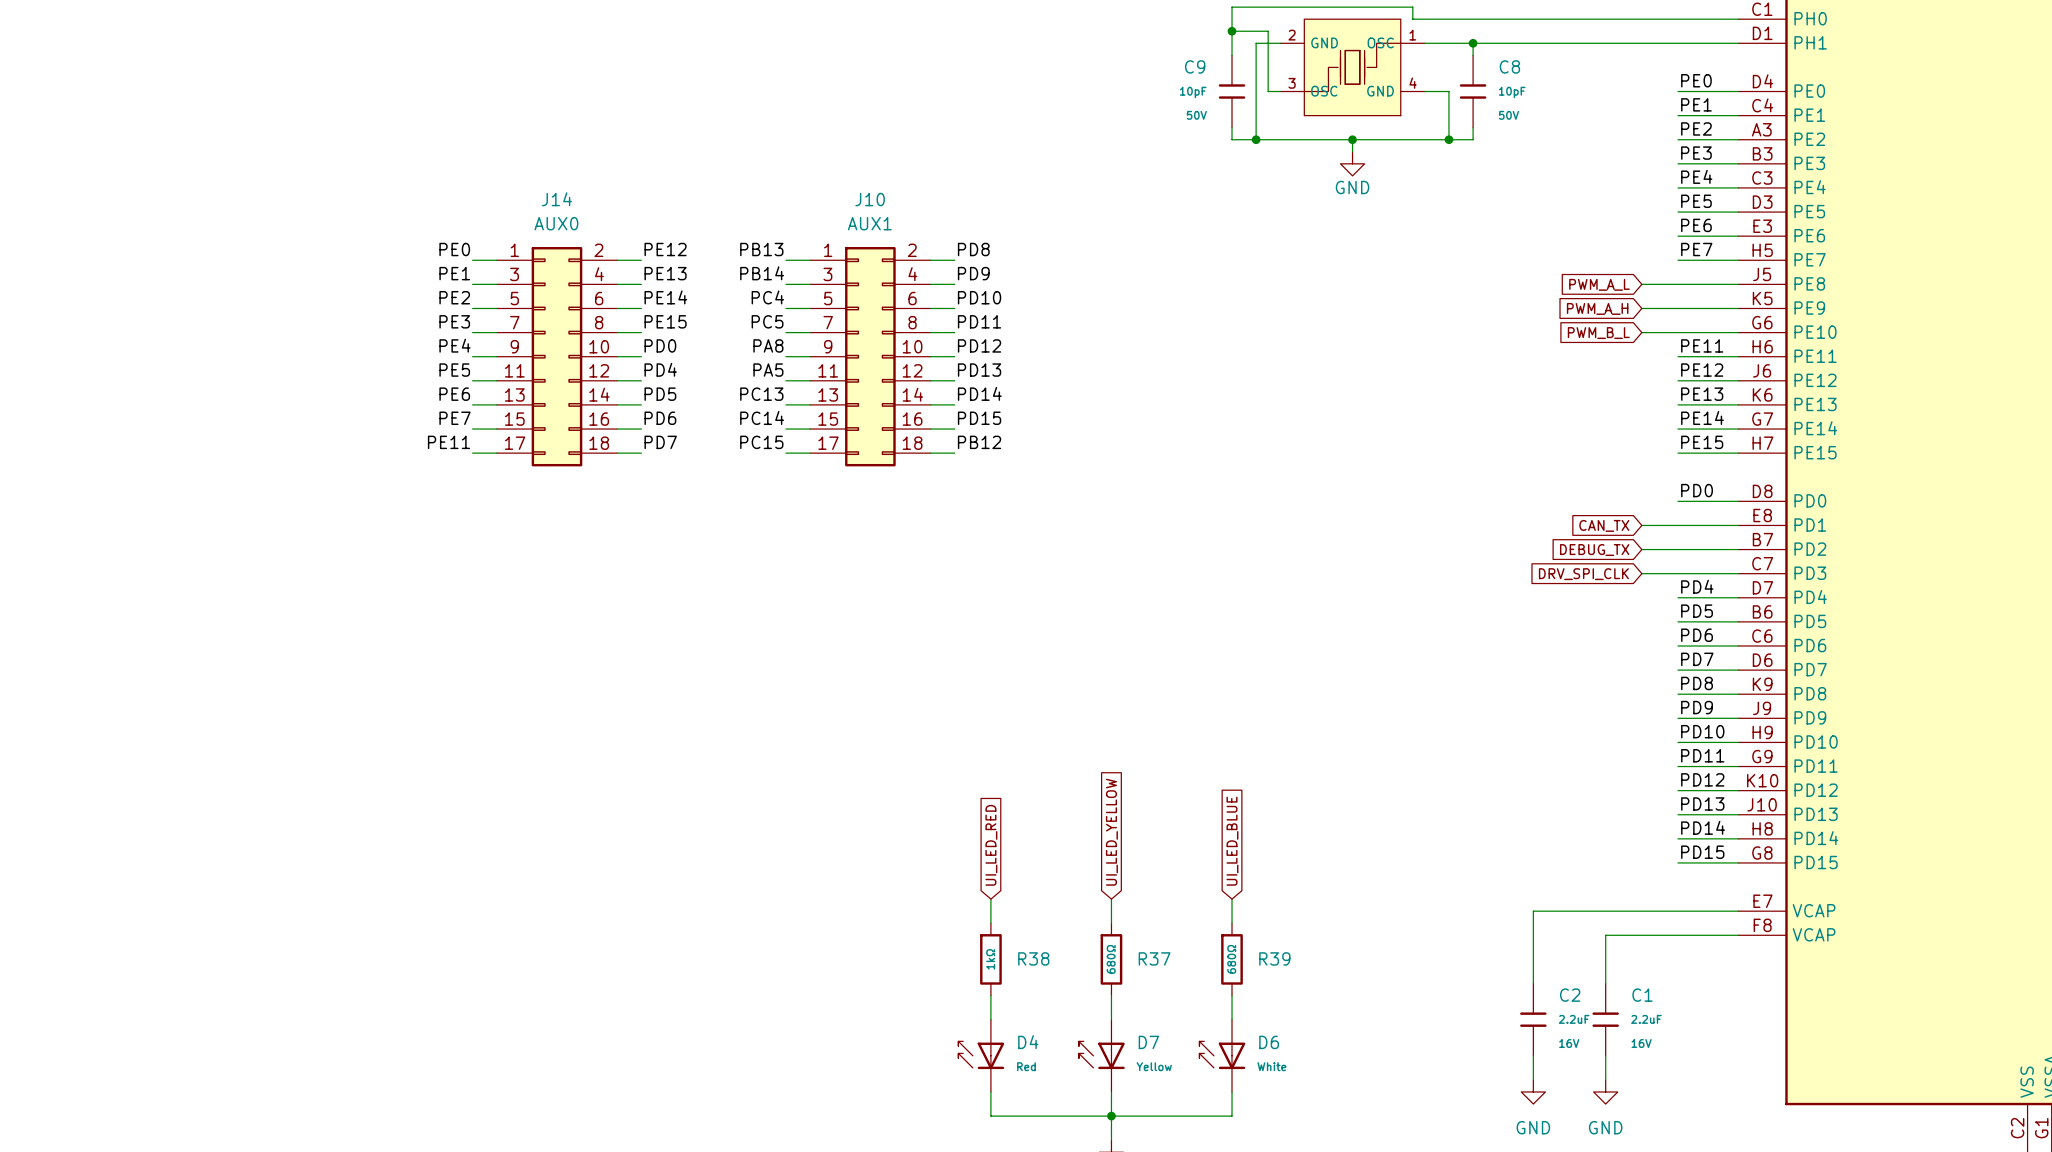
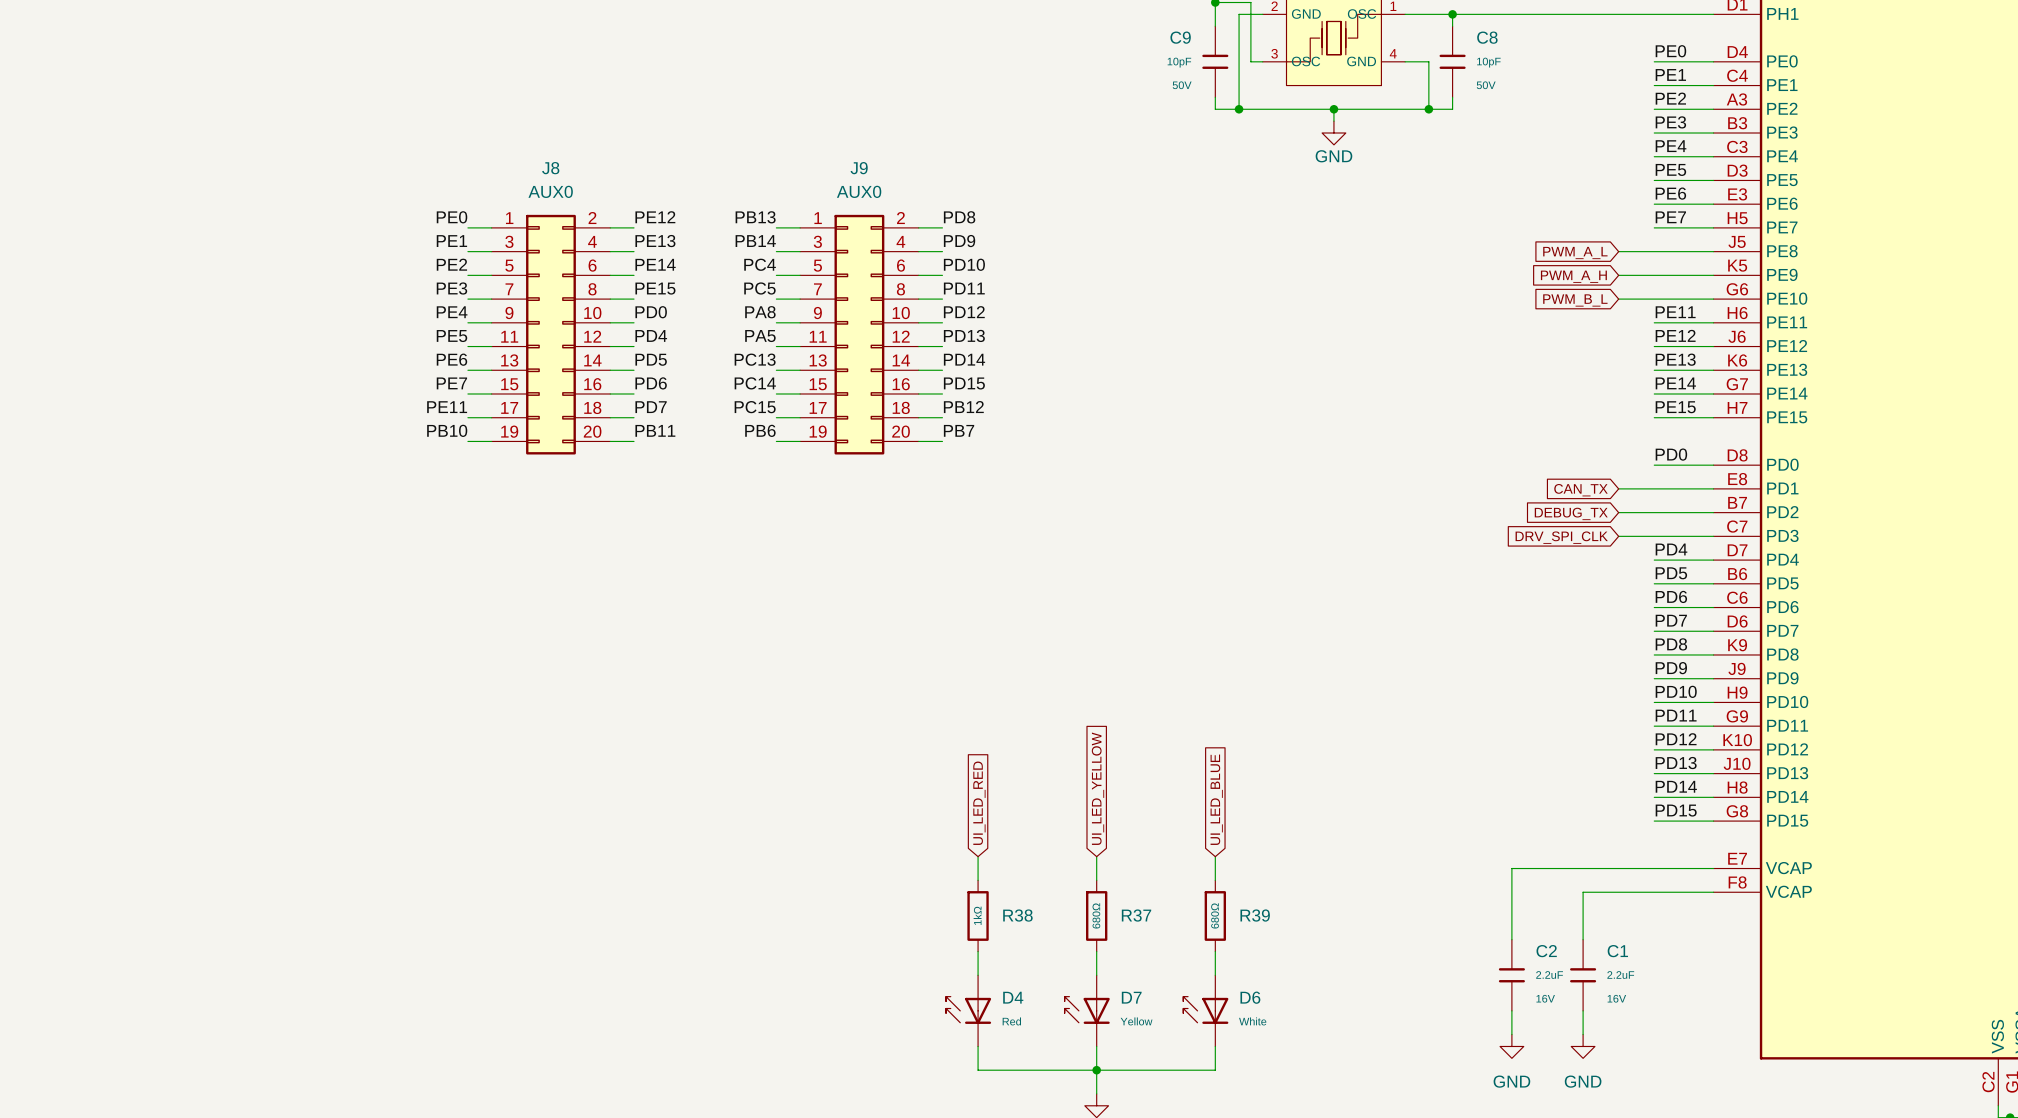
J14: AUX0 (556, 356) -> none
J10: AUX1 (870, 356) -> none
J8: none -> AUX0 (550, 334)
J9: none -> AUX0 (859, 334)
label: none -> PB10 (447, 430)
label: none -> PB11 (655, 430)
label: none -> PB6 (760, 430)
label: none -> PB7 (959, 430)
wire: none -> (467, 441) (491, 441)
wire: none -> (610, 441) (634, 441)
wire: none -> (776, 441) (800, 441)
wire: none -> (918, 441) (942, 441)

